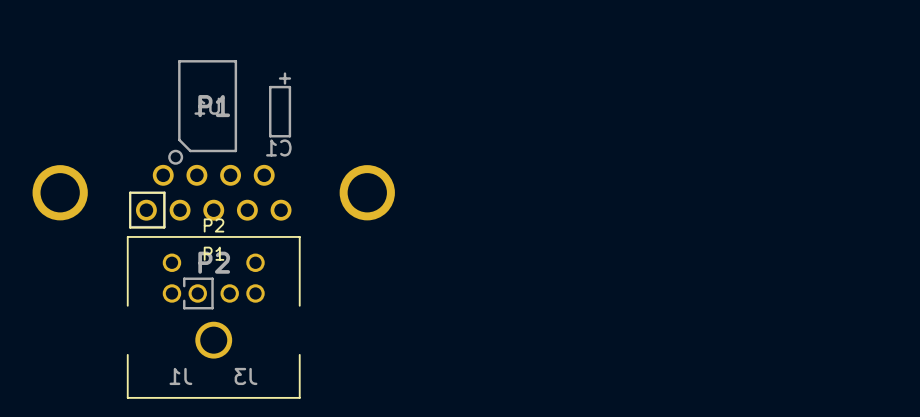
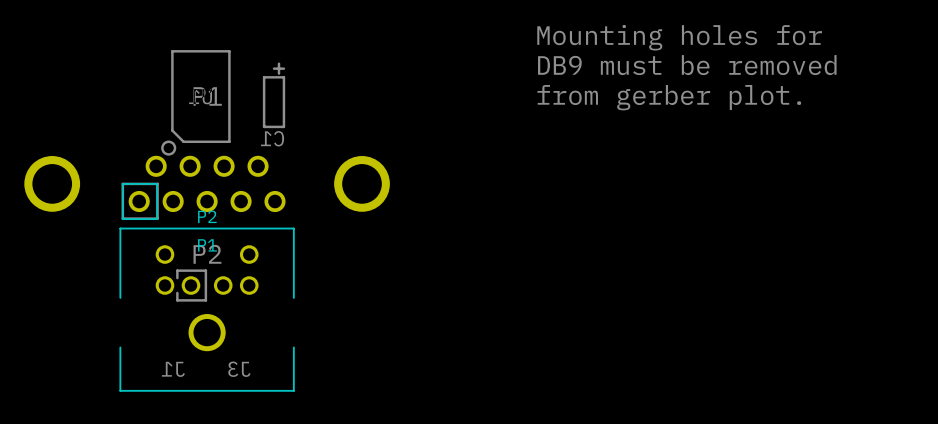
text: none -> Mounting holes for (679, 37)
text: none -> DB9 must be removed (687, 65)
text: none -> from gerber plot. (669, 97)

